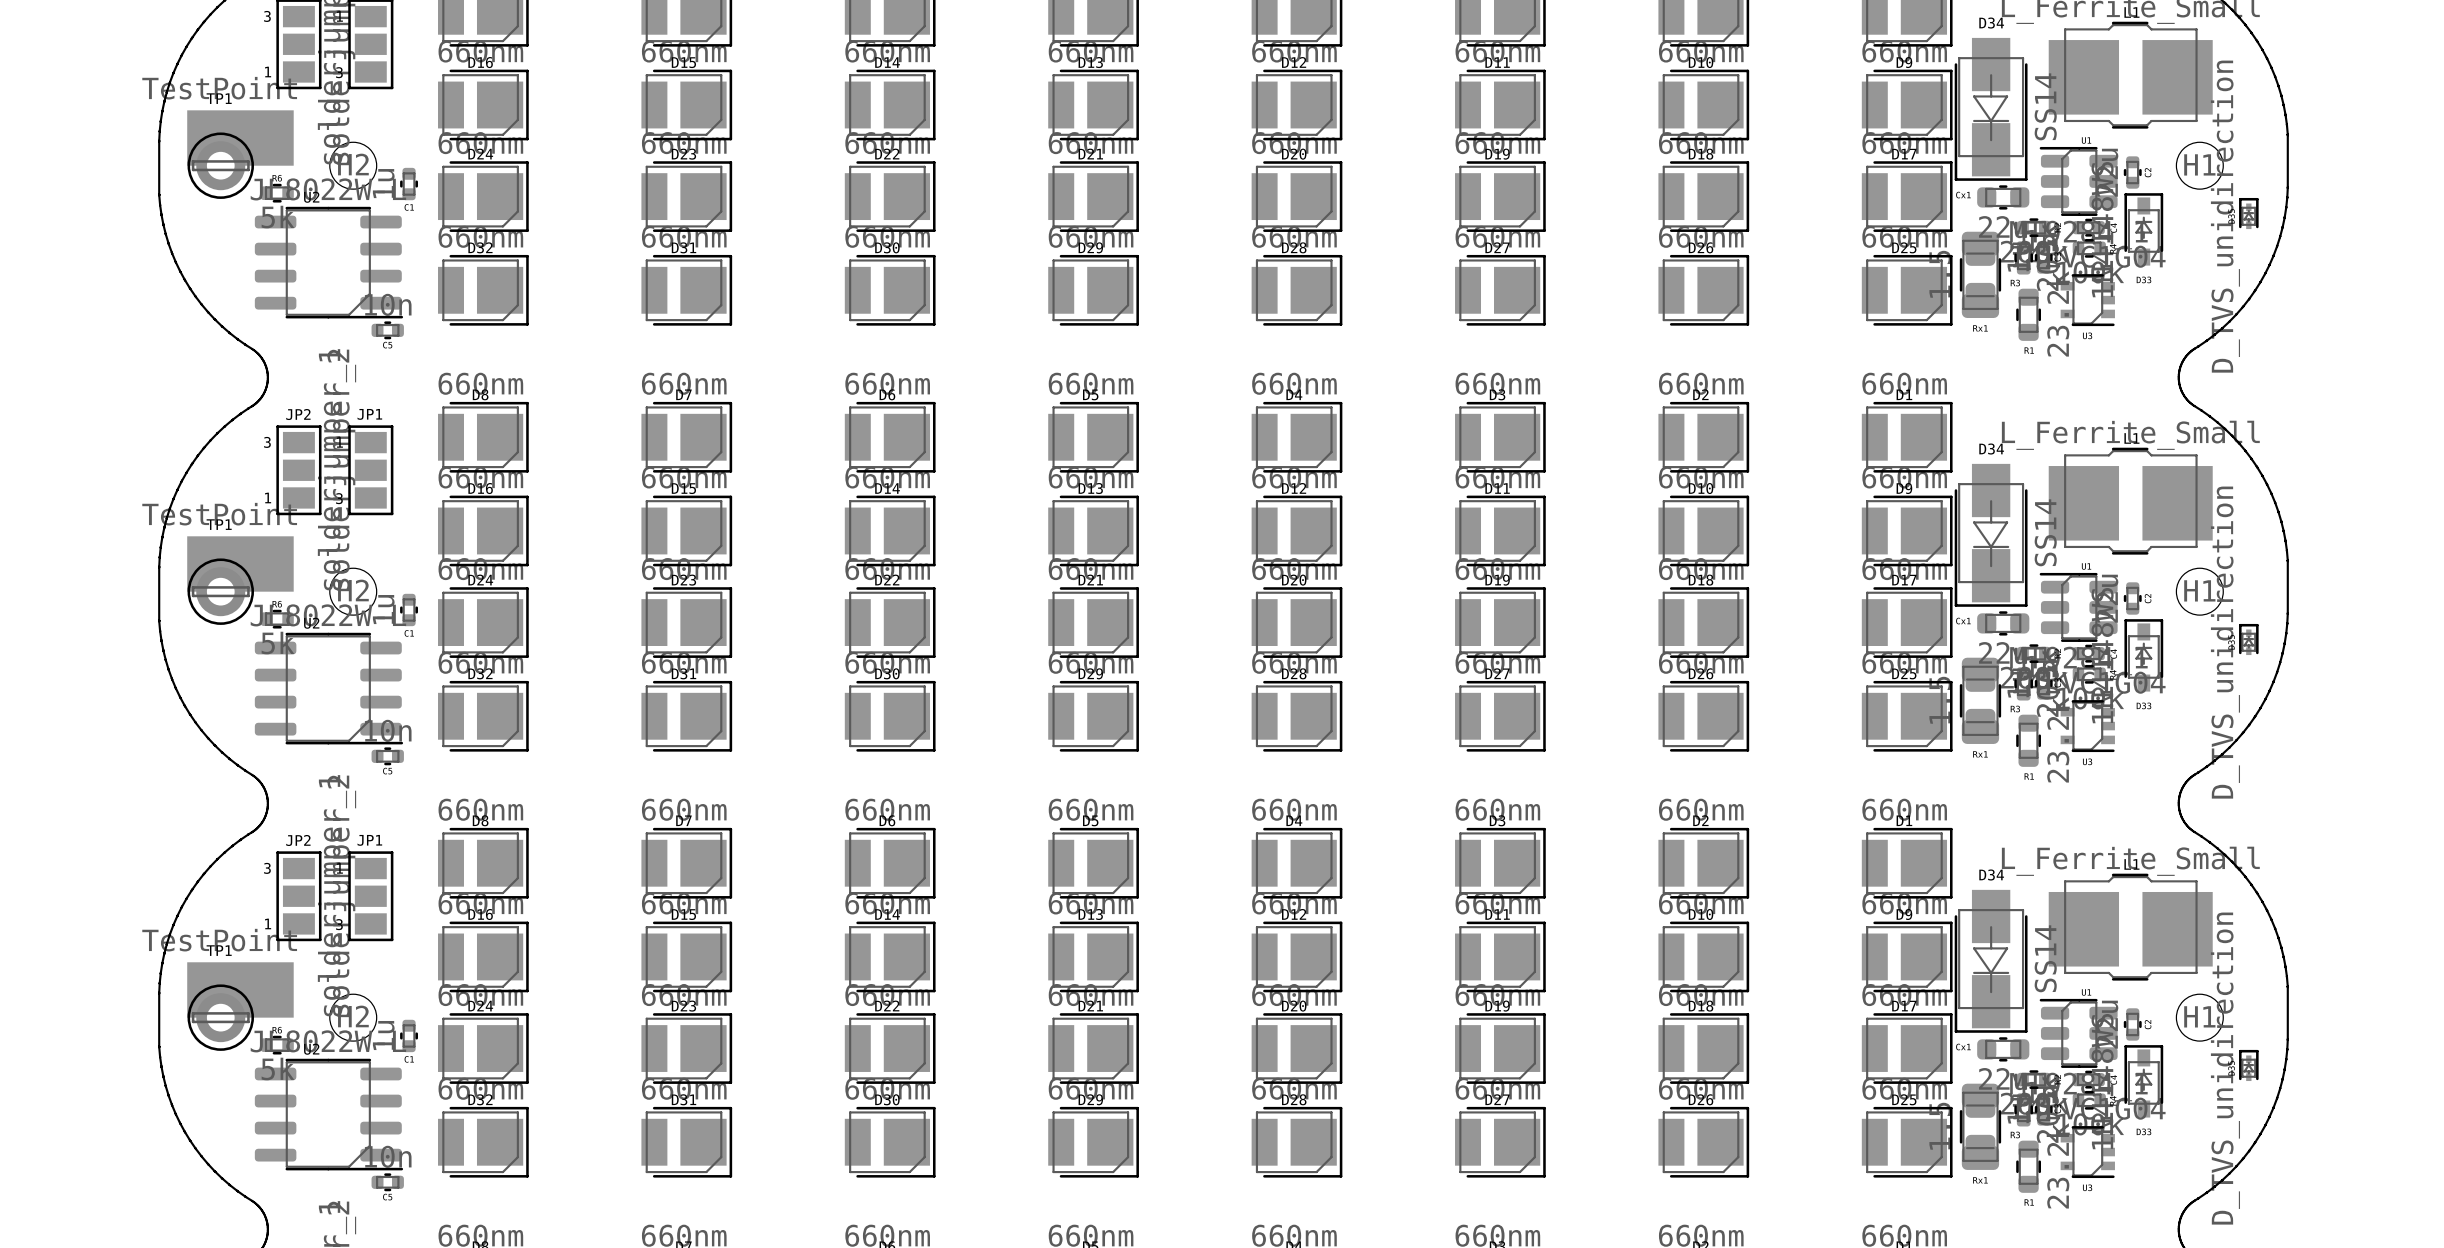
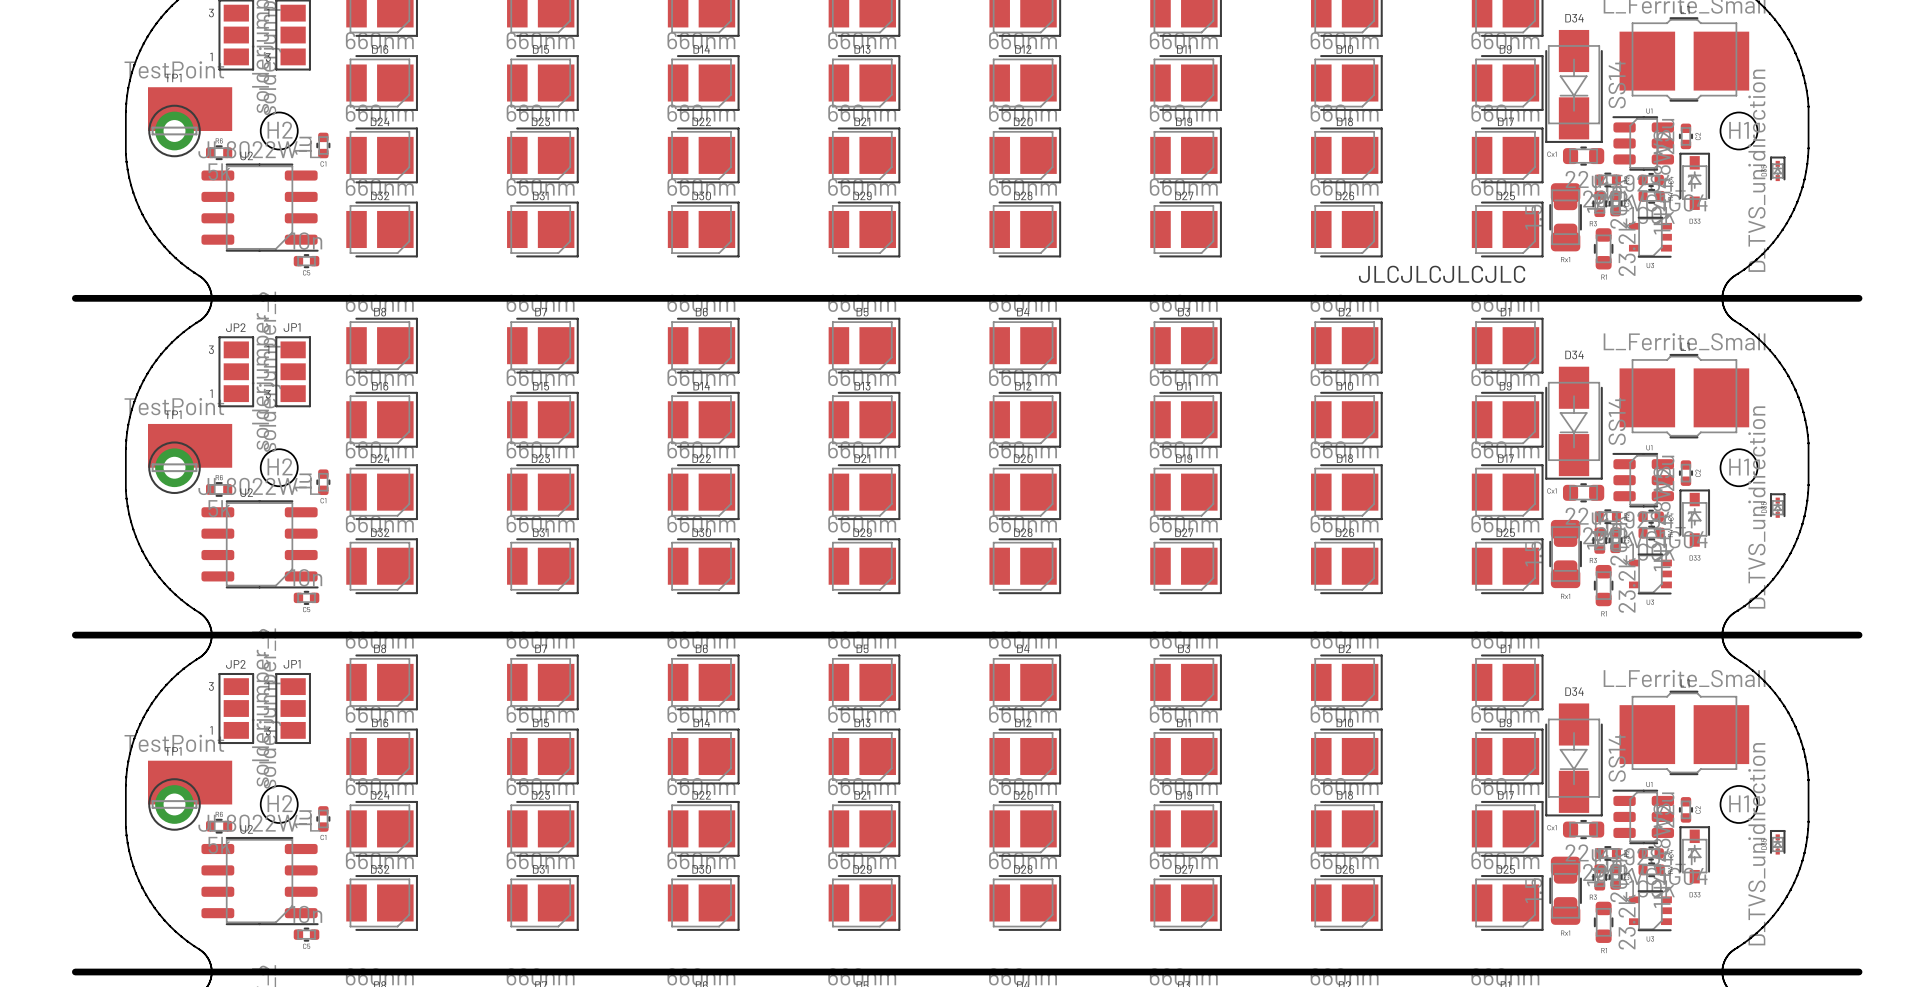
text: none -> JLCJLCJLCJLC (1442, 274)
board edge: none -> (75, 298) (1859, 298)
board edge: none -> (75, 635) (1859, 635)
board edge: none -> (75, 972) (1859, 972)

